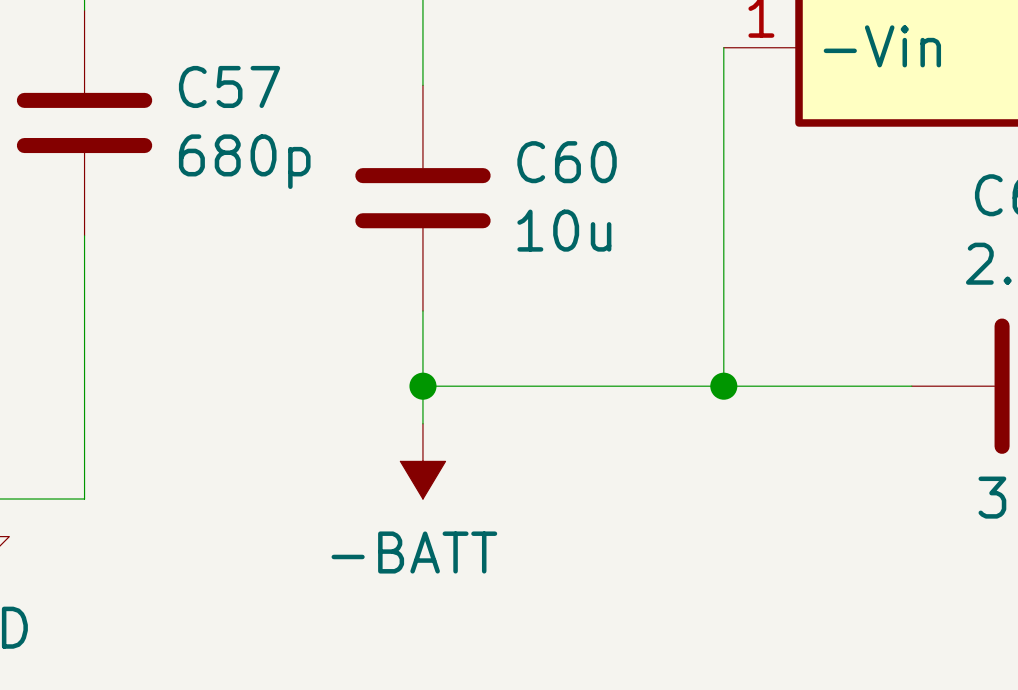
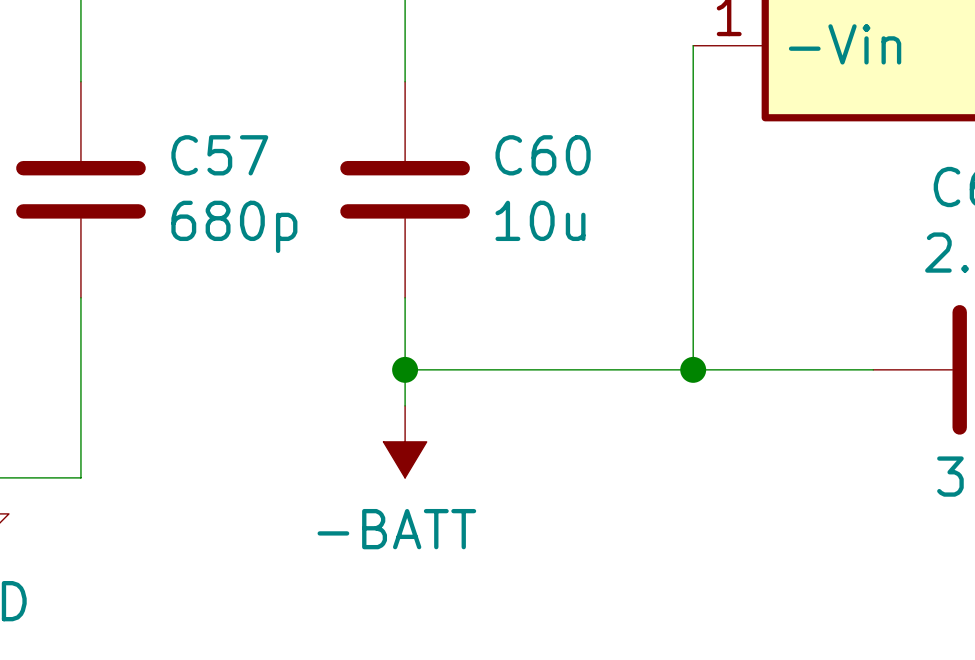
C57 position: (84, 122) -> (80, 189)

